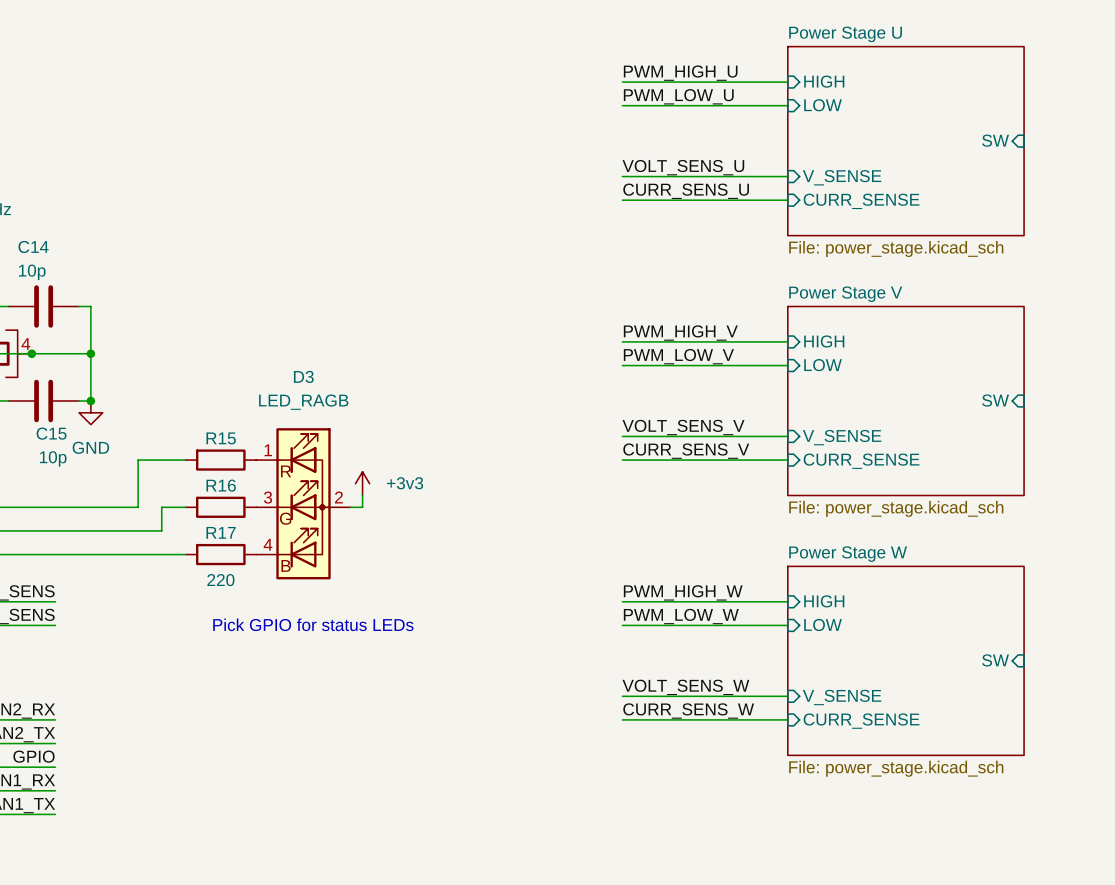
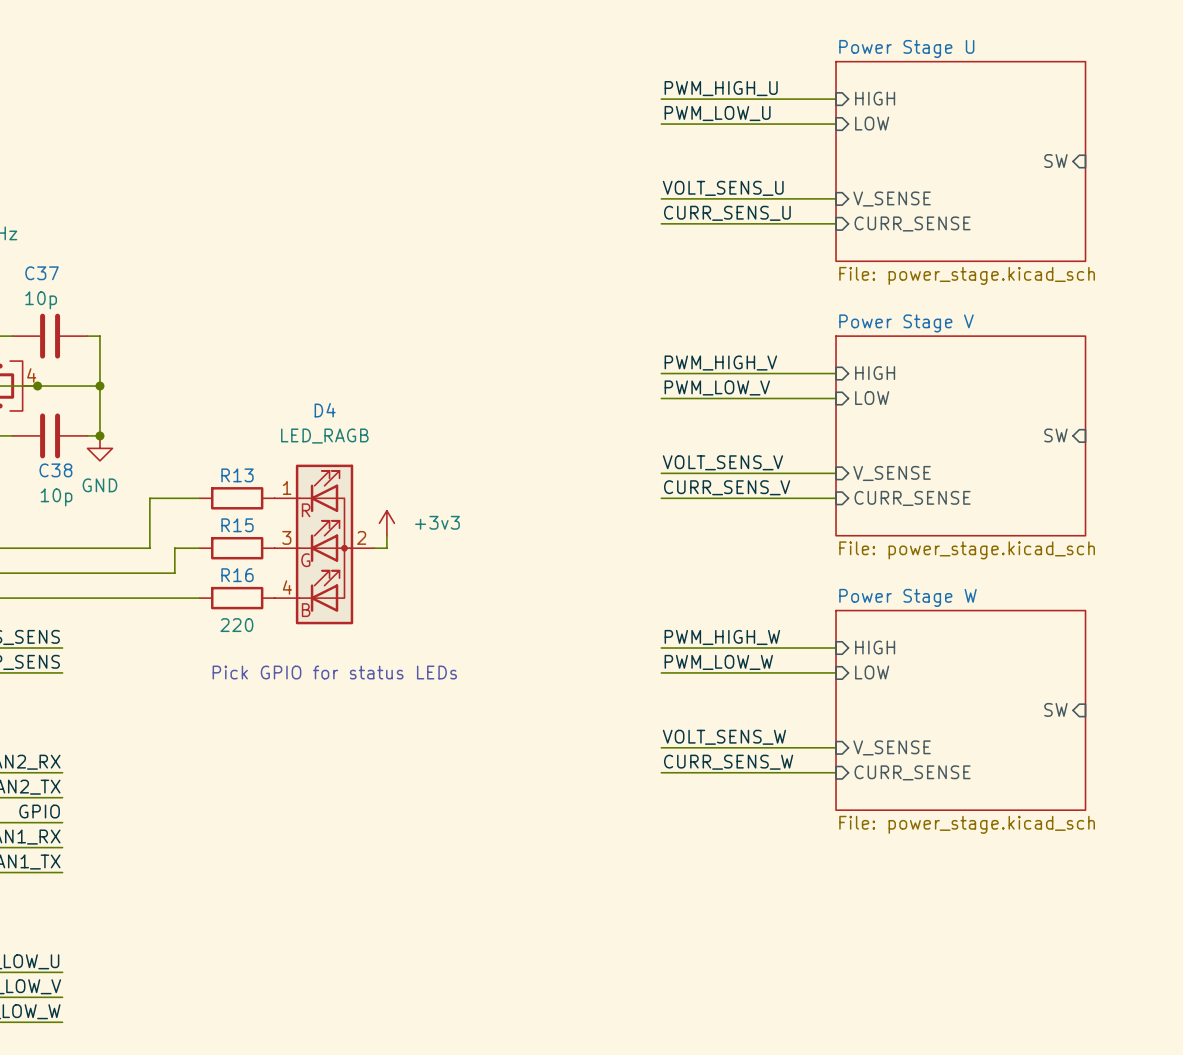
C14 name: C14 (33, 246) -> C37 (42, 273)
D3 name: D3 (303, 376) -> D4 (325, 410)
C15 name: C15 (51, 433) -> C38 (55, 470)
R15 name: R15 (221, 438) -> R13 (237, 475)
R16 name: R16 (221, 485) -> R15 (237, 525)
R17 name: R17 (221, 532) -> R16 (237, 575)

